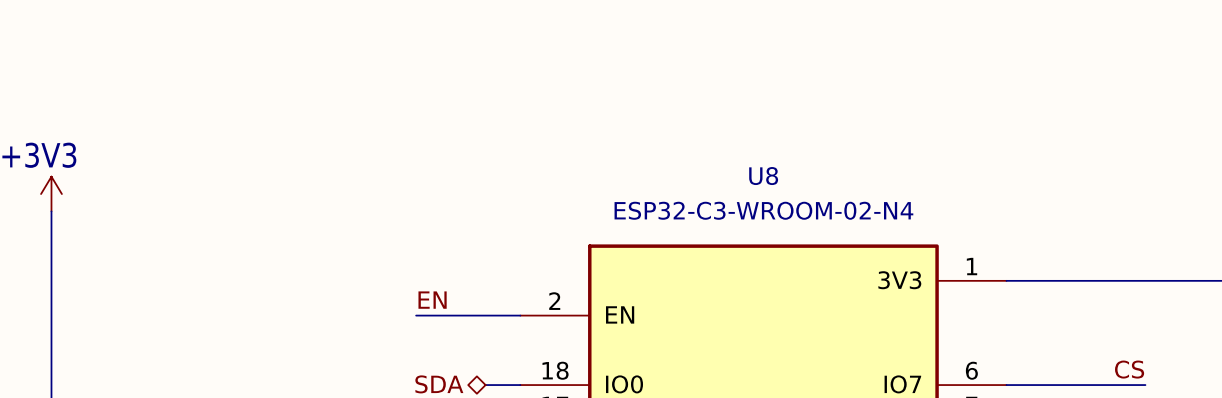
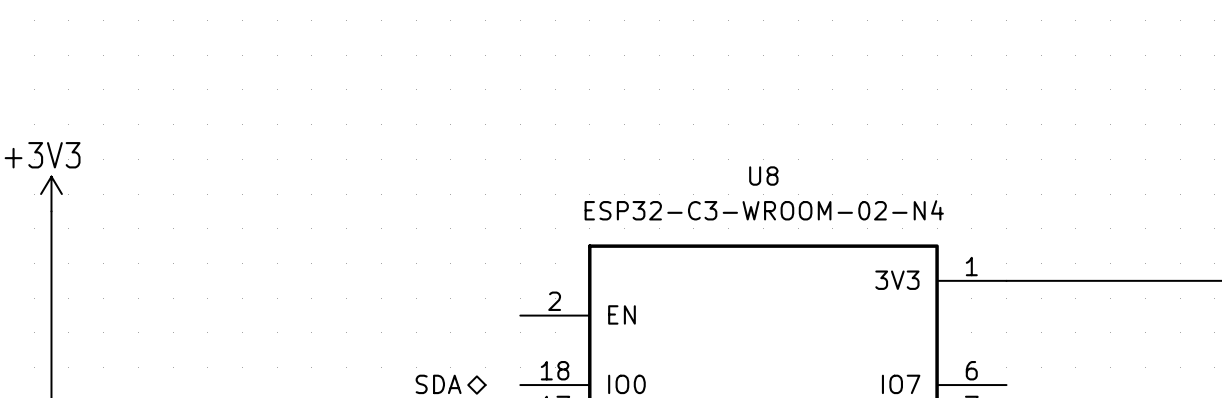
label: EN (432, 300) -> none
wire: (416, 315) (520, 315) -> none
label: CS (1129, 369) -> none
wire: (485, 385) (520, 385) -> none
wire: (1006, 385) (1145, 385) -> none

